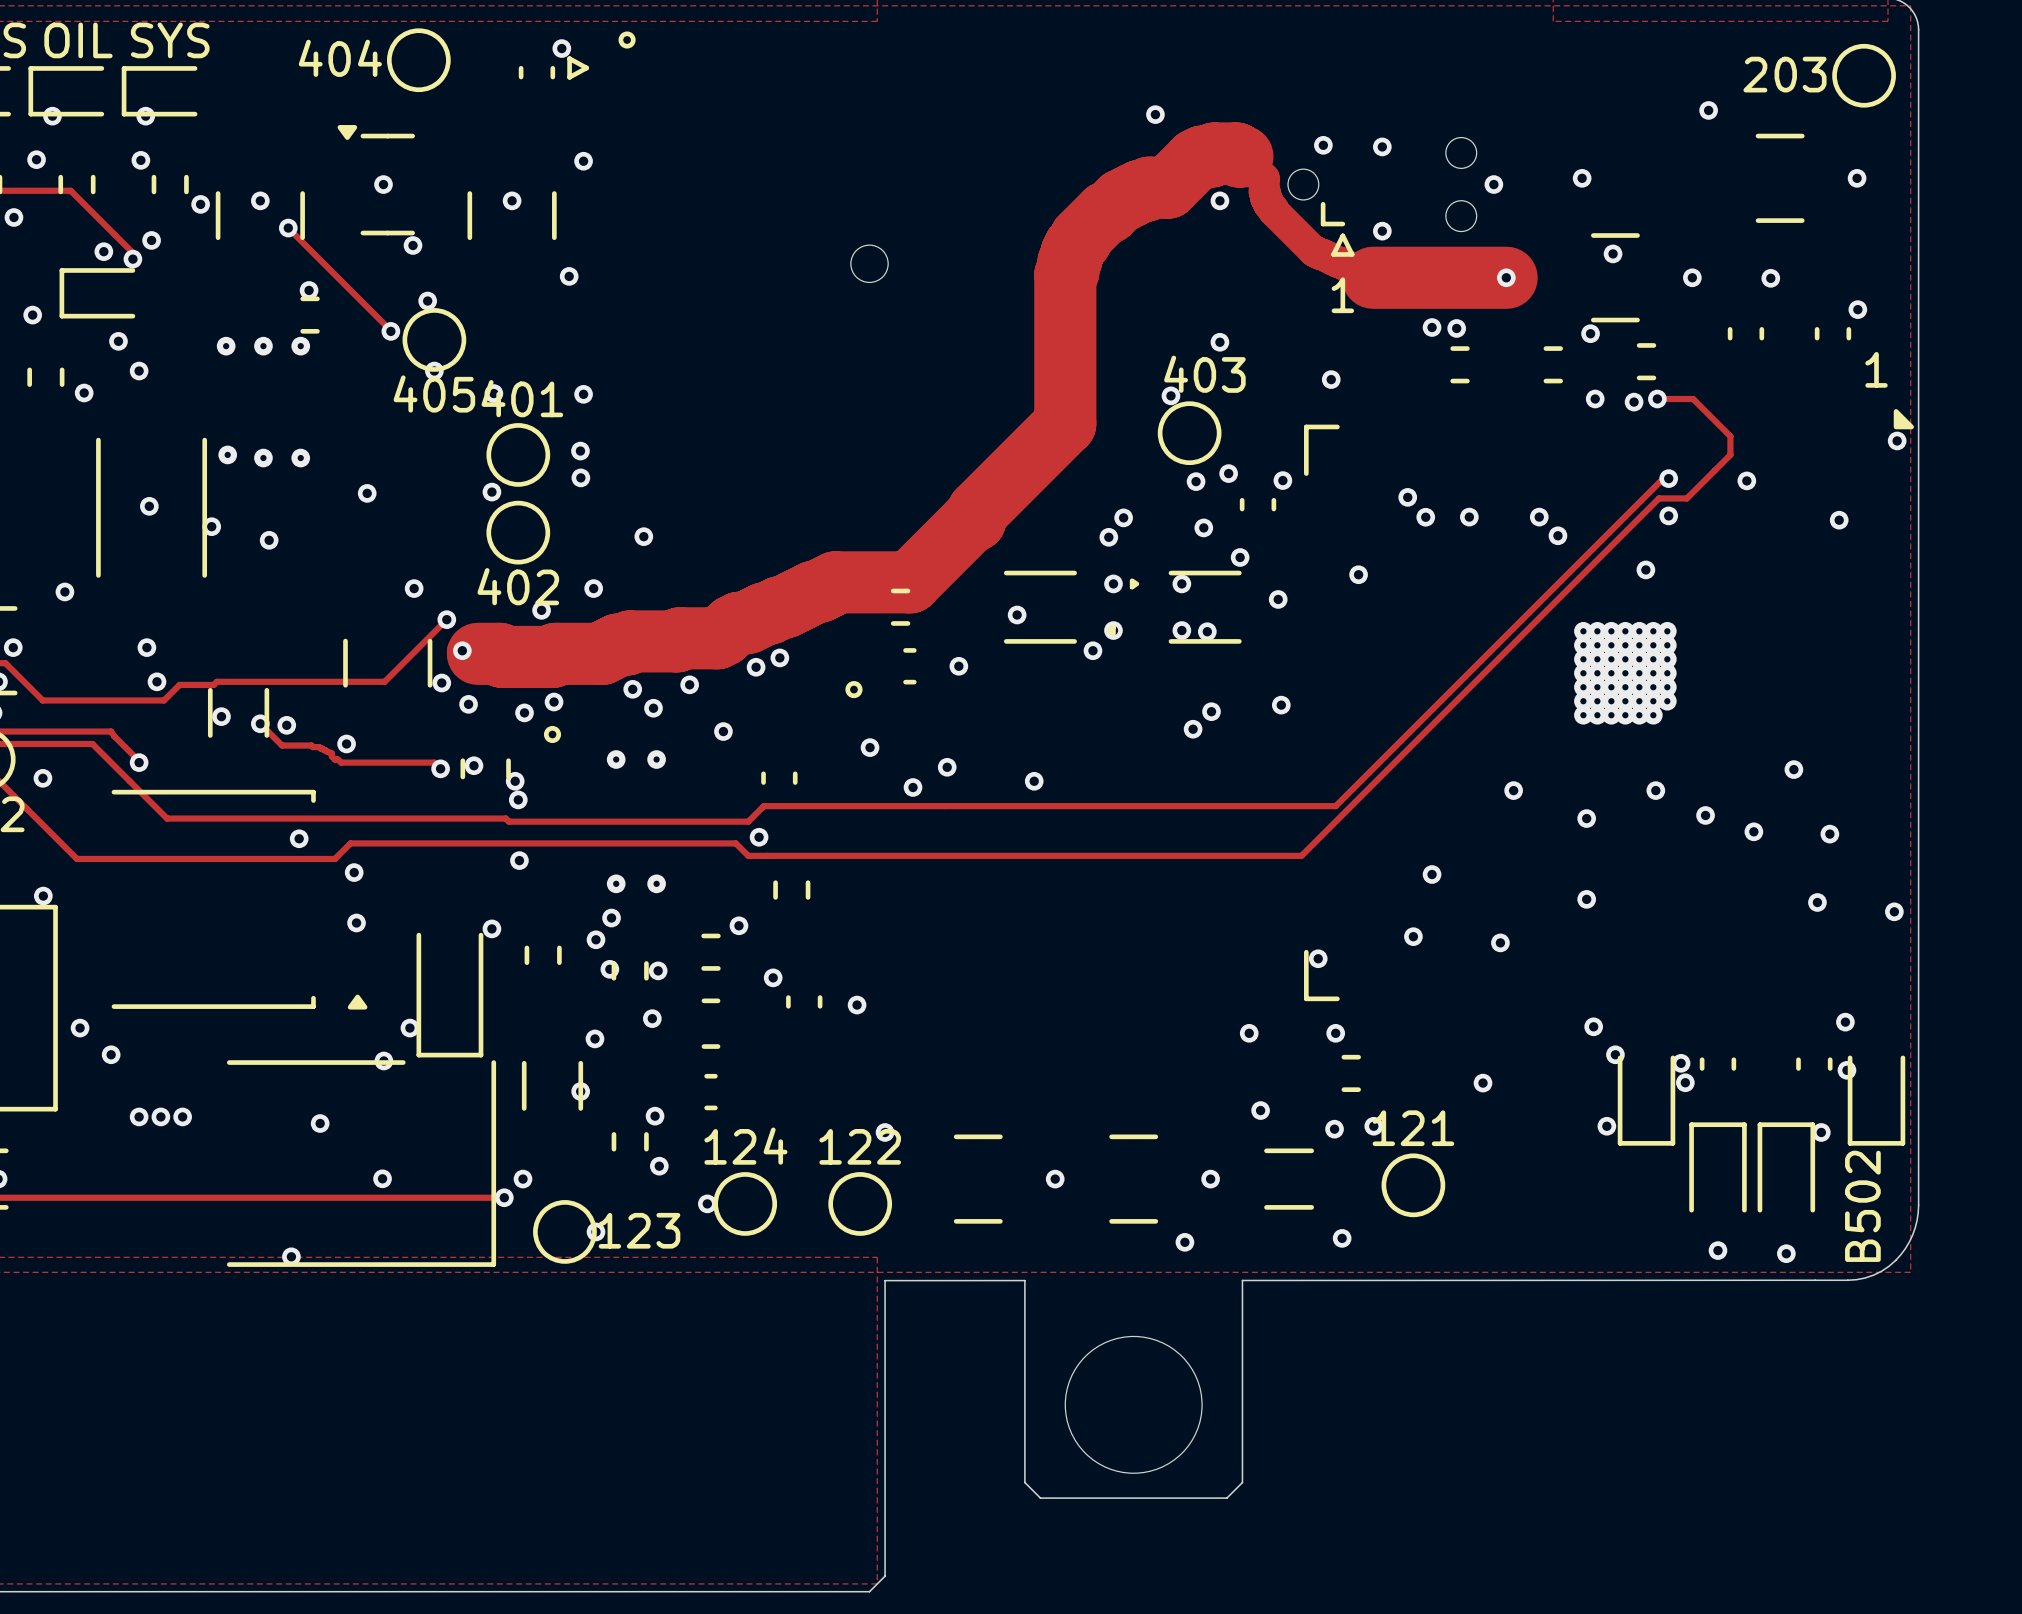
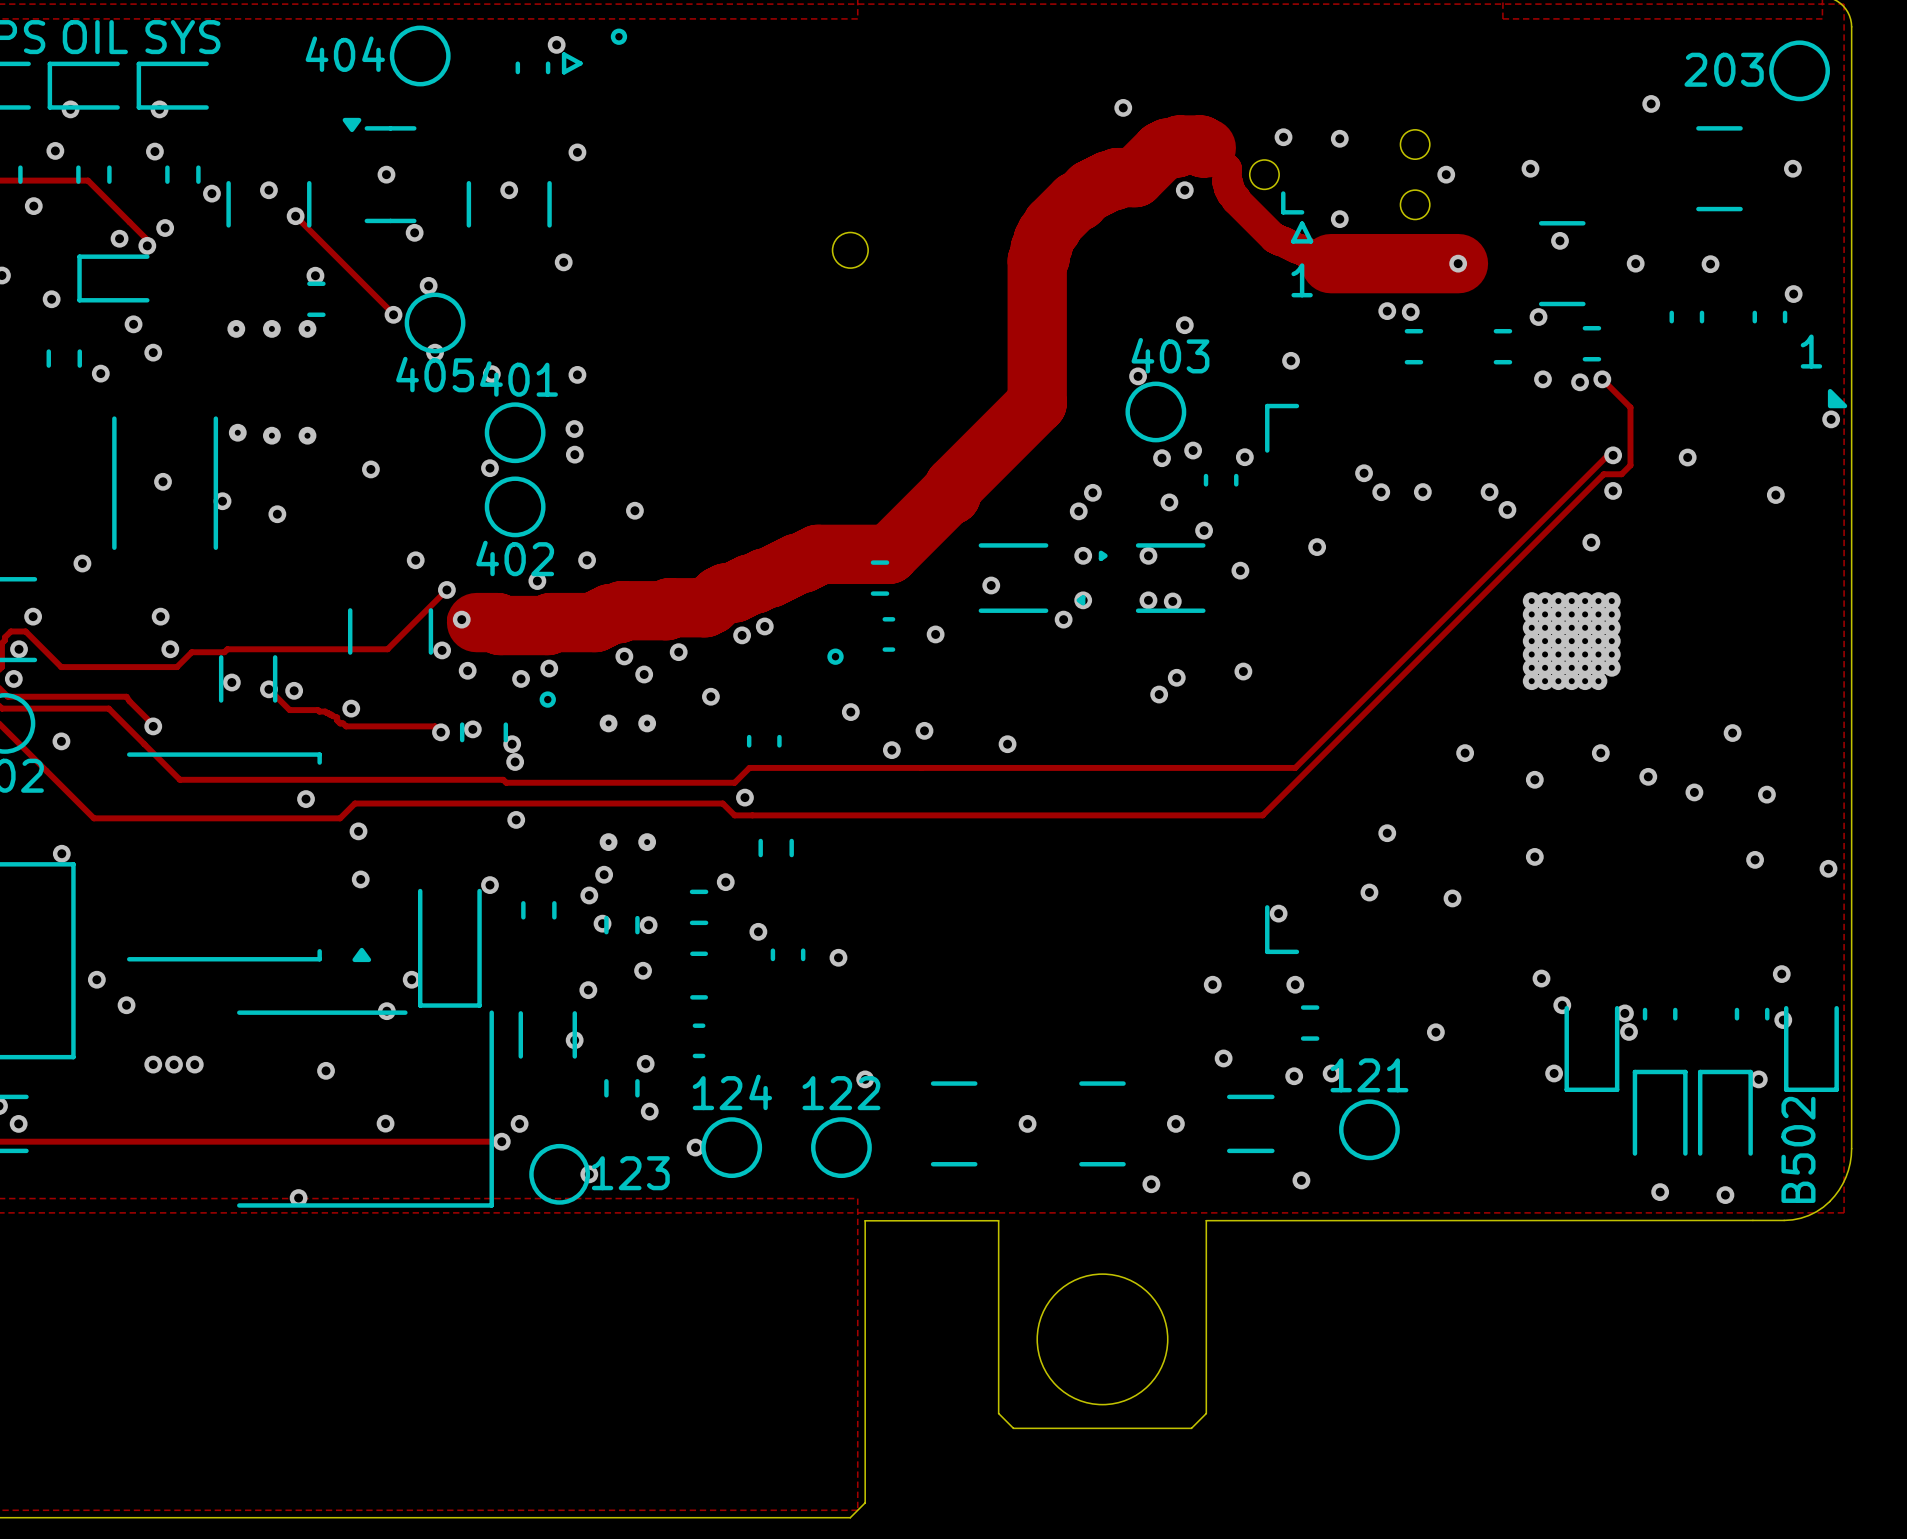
track: (1657, 398) (1693, 398) (1730, 436) (1730, 454) (1686, 498) (1677, 498) -> (1602, 379) (1630, 407) (1630, 465) (1621, 474)

